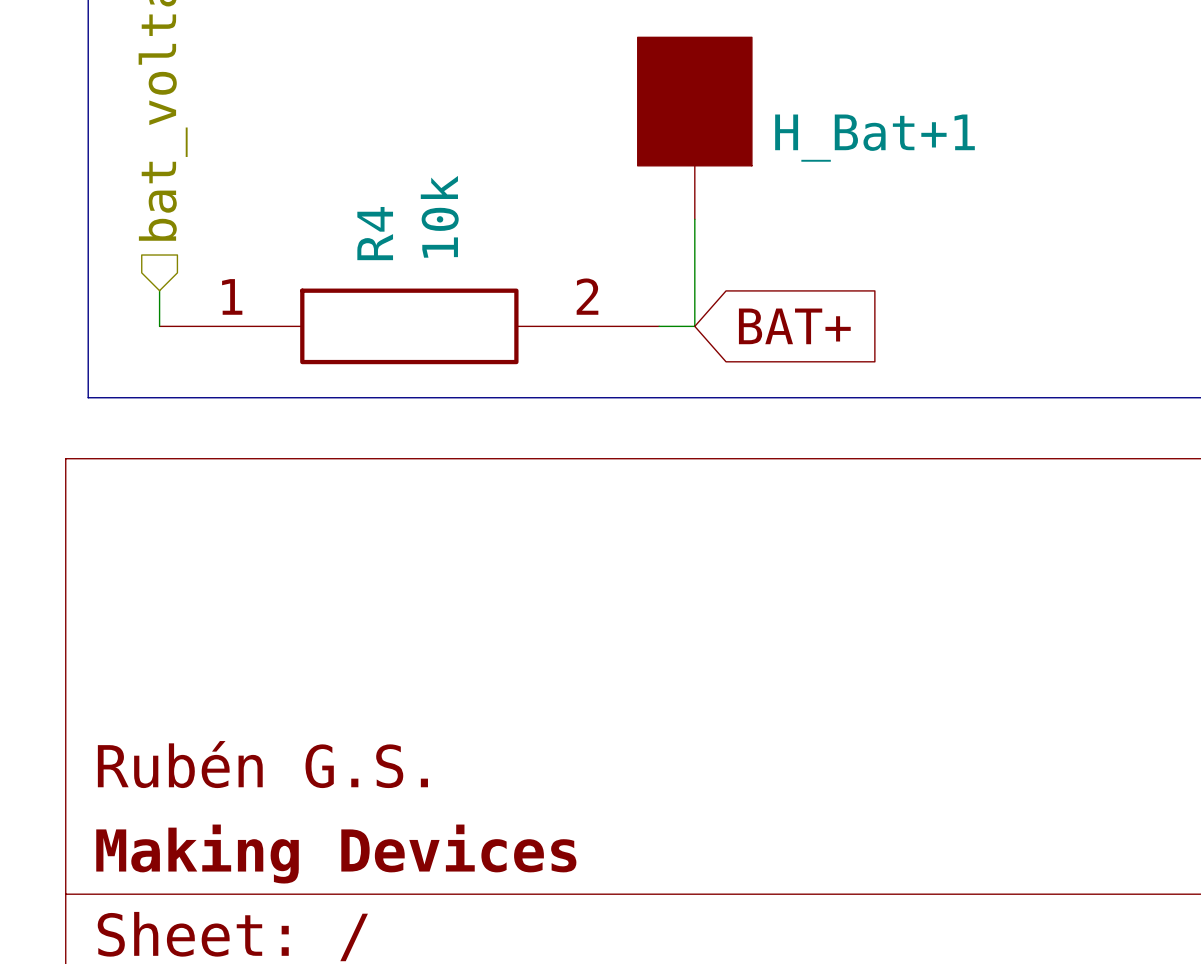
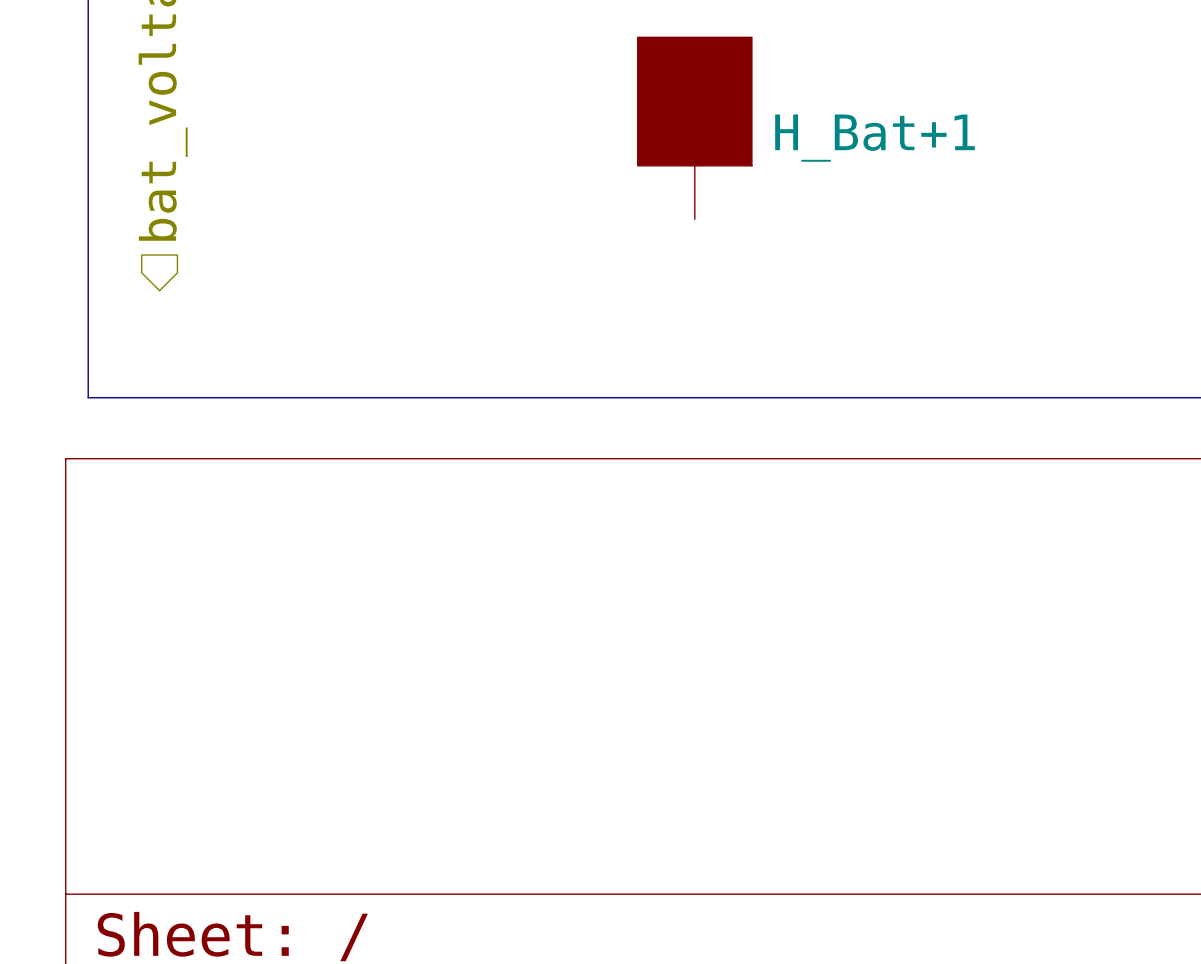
wire: (694, 219) (694, 326) (659, 326) -> none
wire: (159, 290) (159, 326) -> none
R4: 10k (409, 326) -> none
global label: BAT+ (794, 326) -> none
title block: Rubén G.S. (262, 764) -> none
title block: Making Devices (336, 854) -> none

